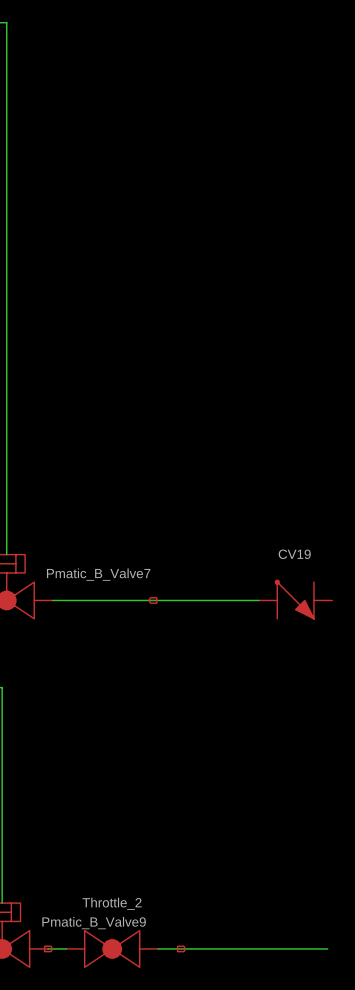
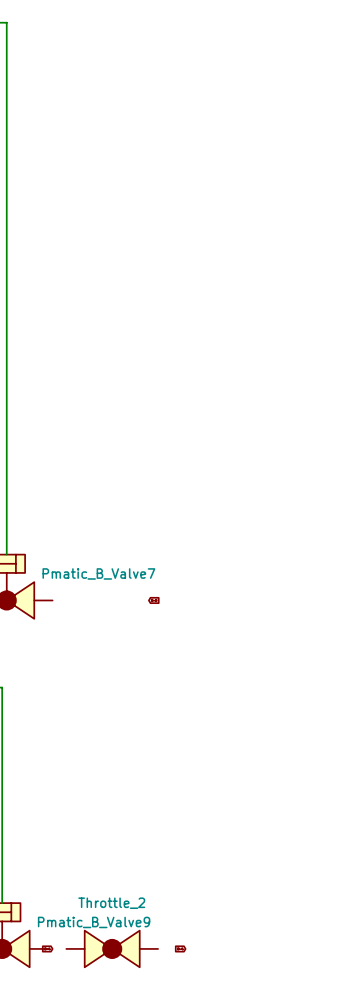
CV19: (295, 599) -> none
wire: (52, 600) (258, 600) -> none
wire: (48, 948) (66, 948) -> none
wire: (158, 948) (327, 948) -> none

